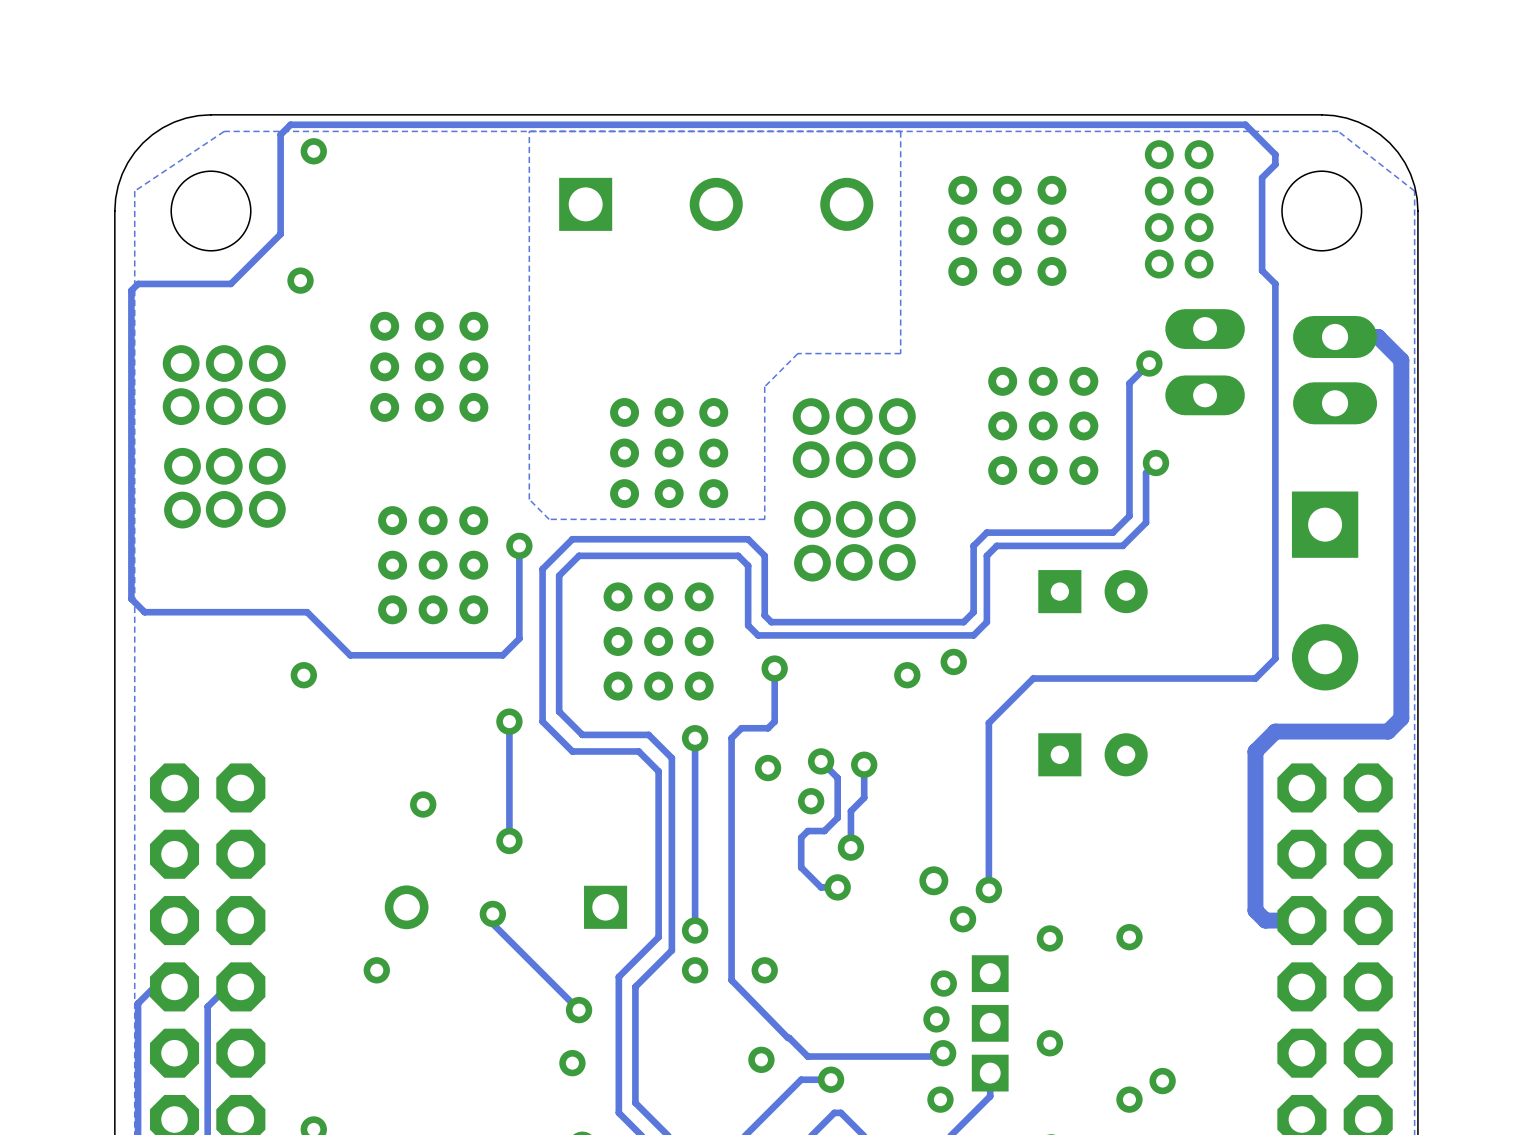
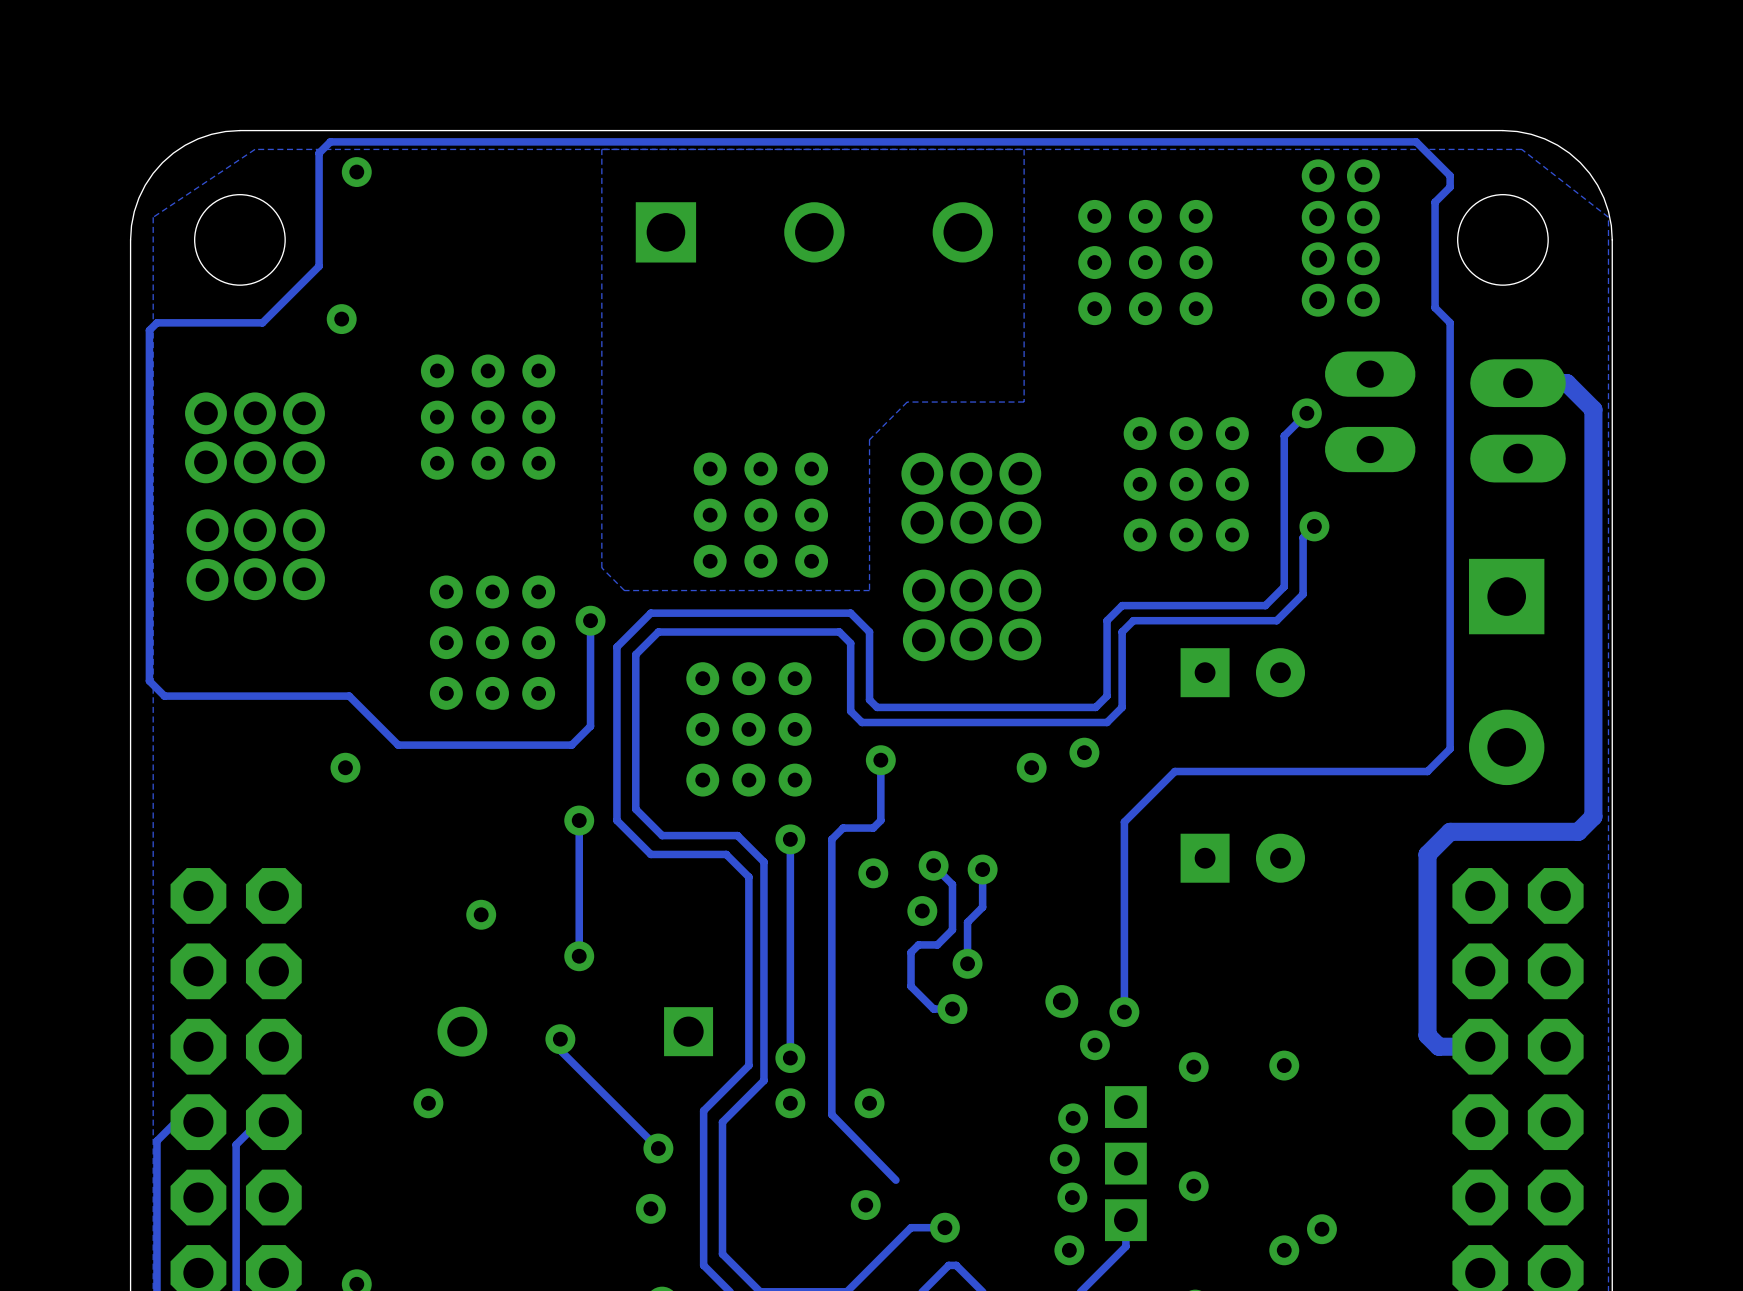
track: (787, 1037) (807, 1056) (939, 1056) (943, 1053) -> none

